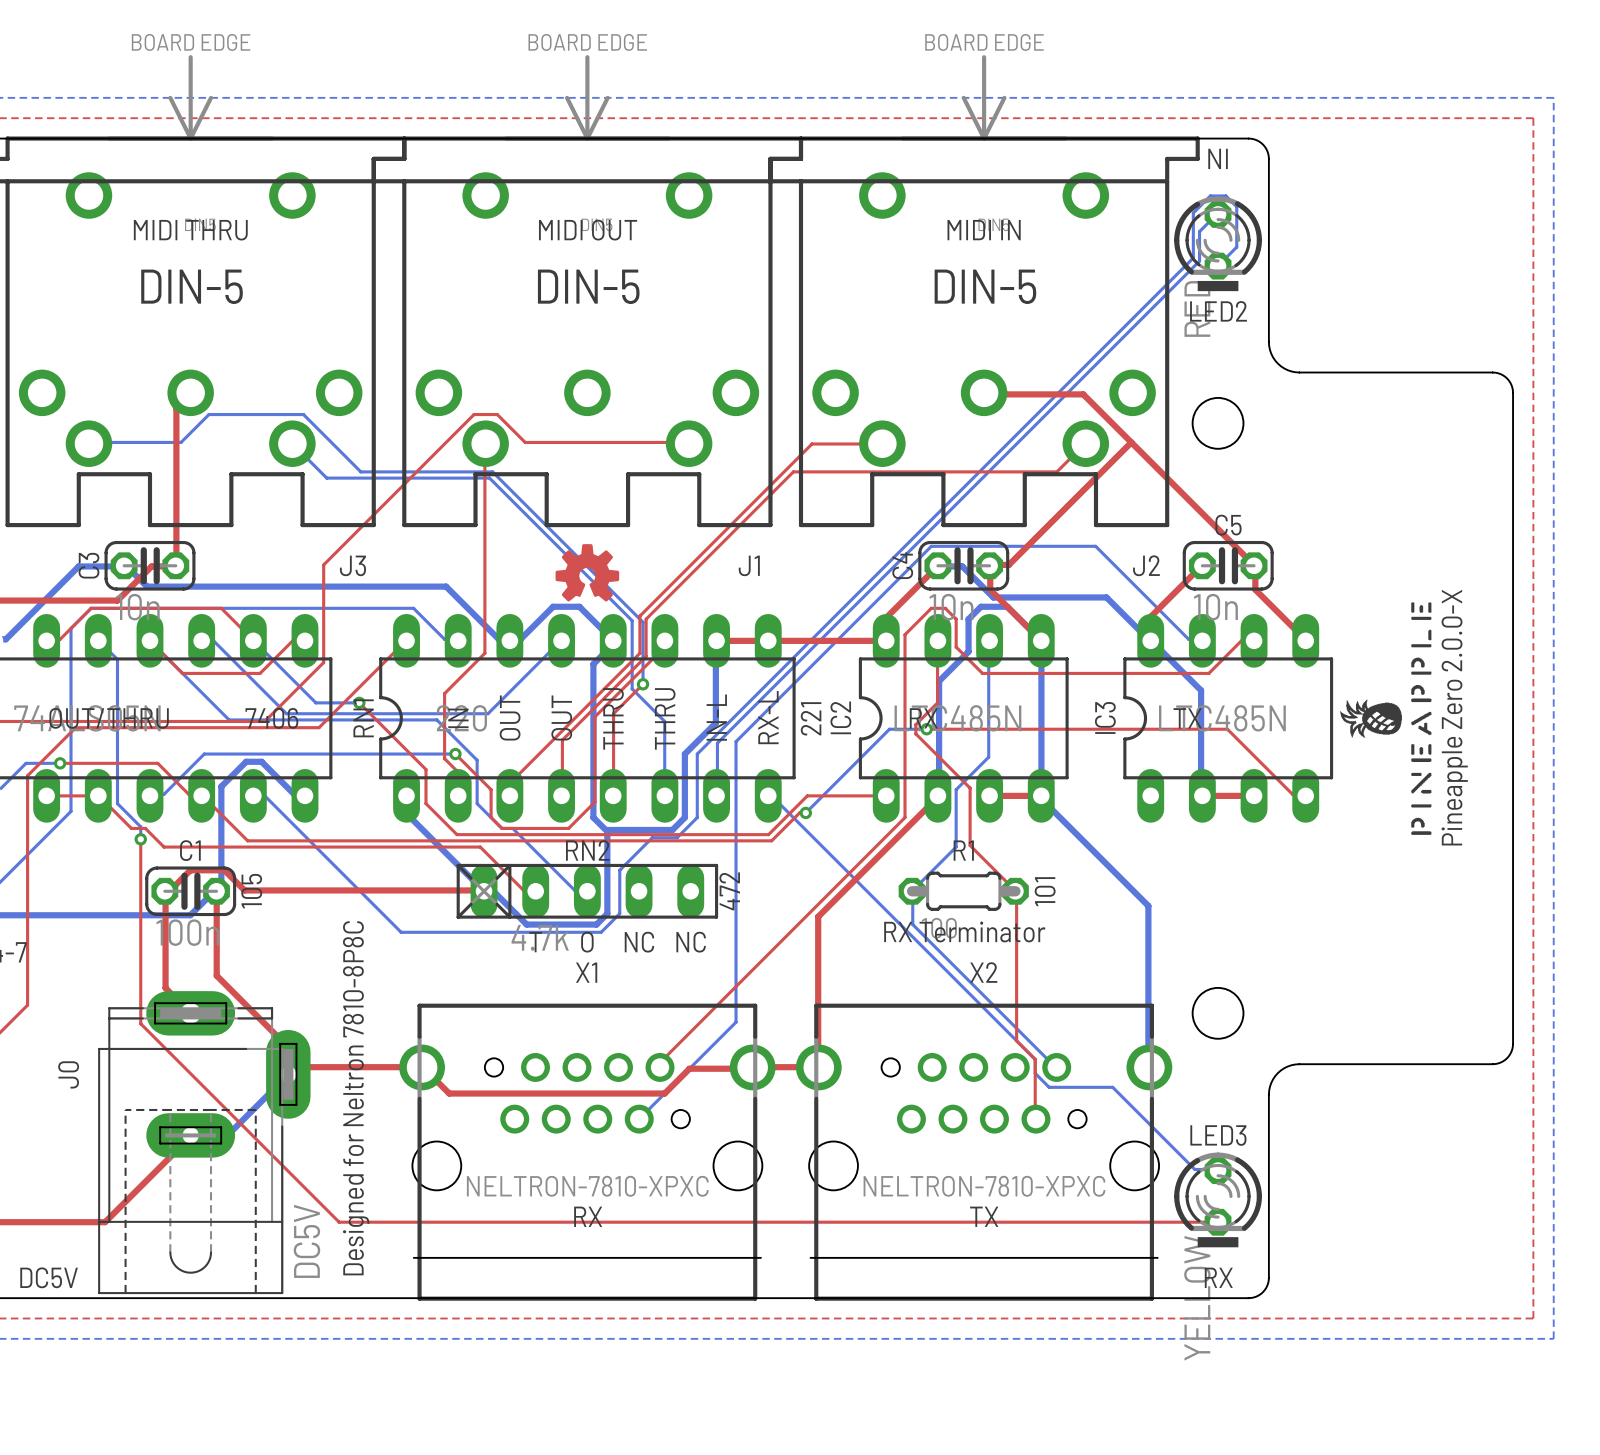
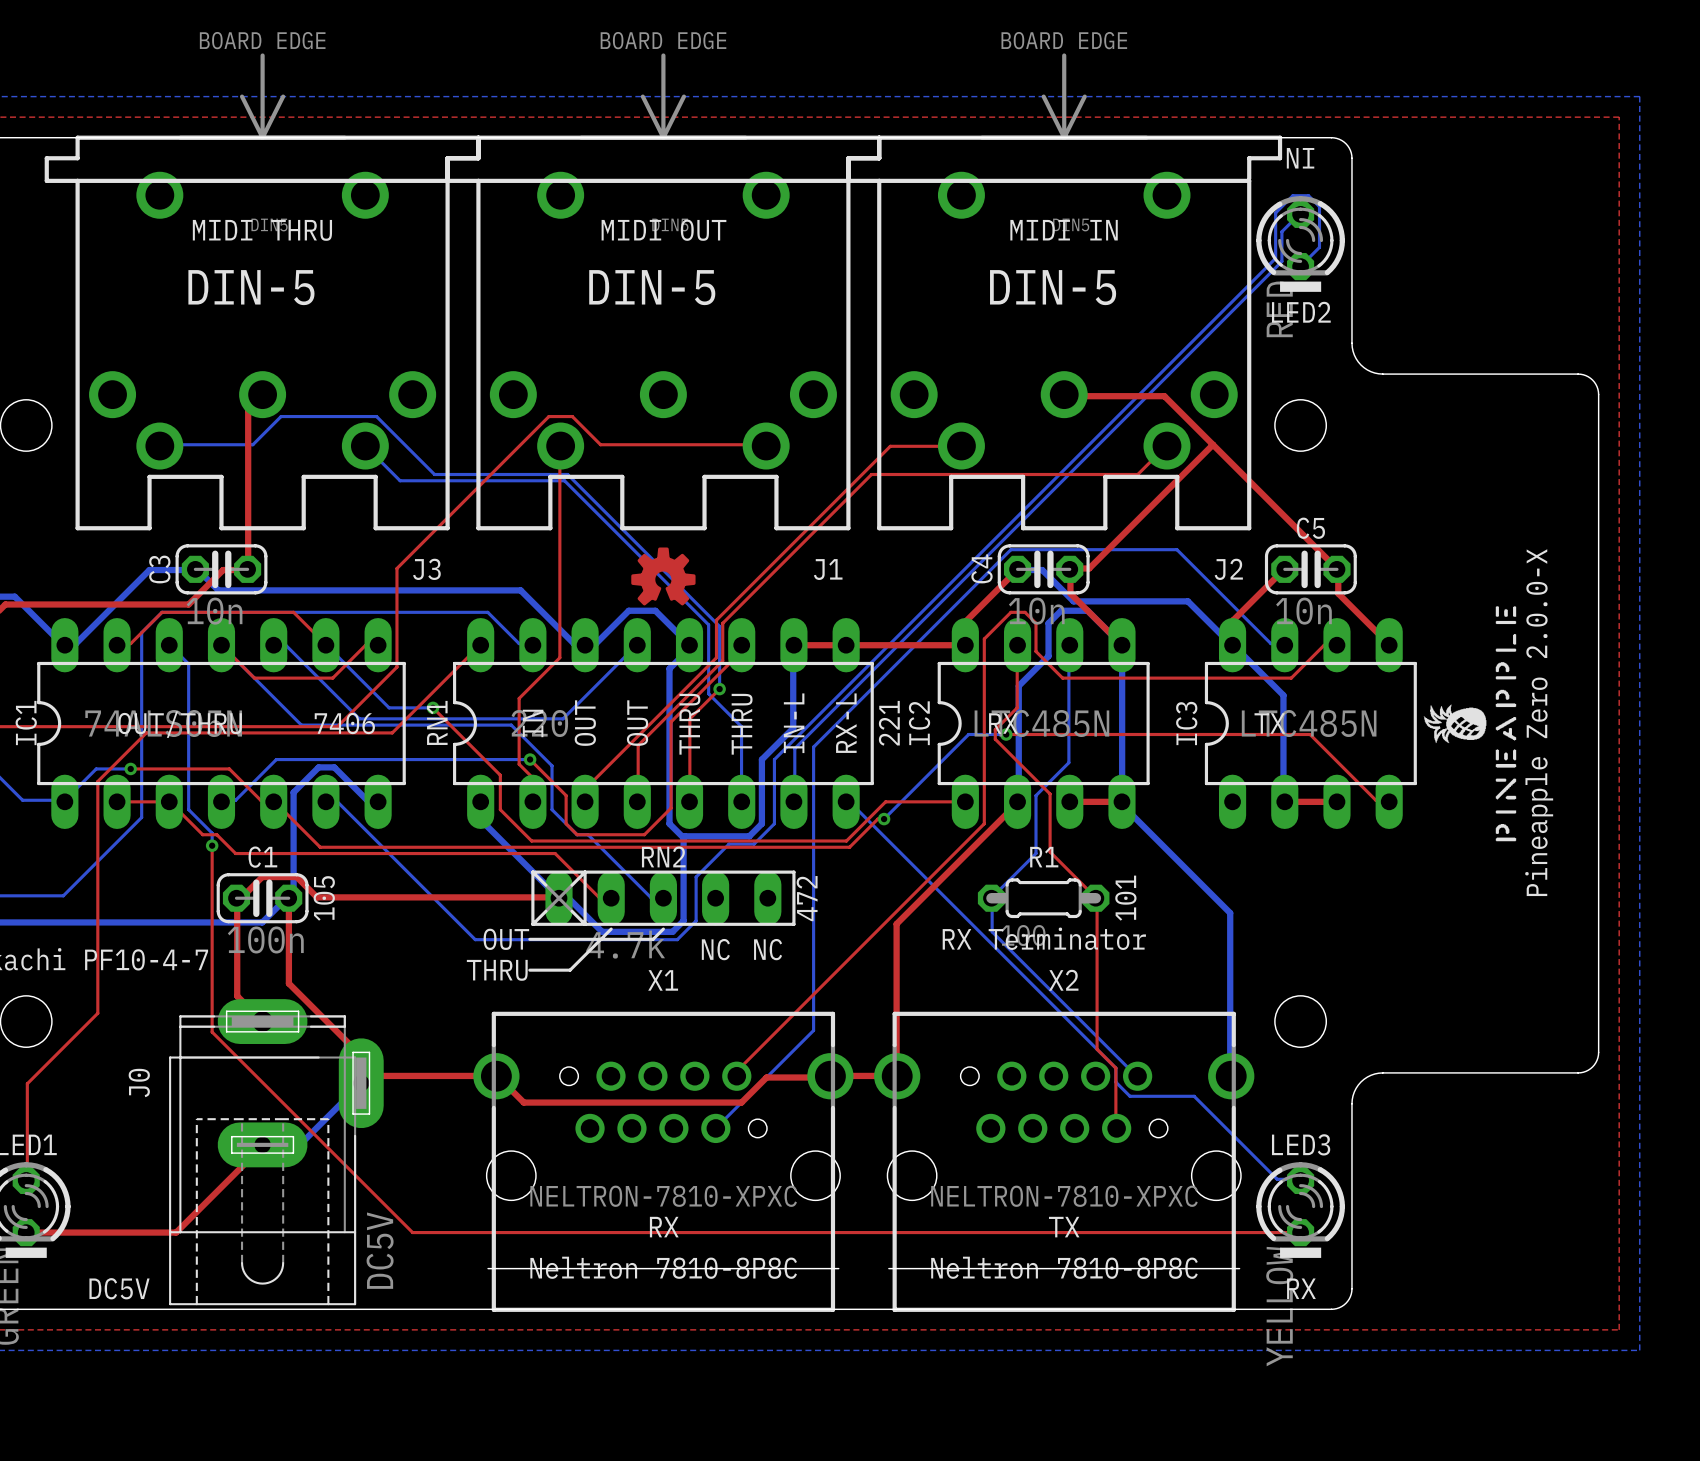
line: none -> (611, 929) (570, 970) (529, 970)
line: none -> (663, 929) (653, 939) (529, 939)
text: none -> OUT (506, 939)
text: T (535, 942) -> none
text: O (587, 942) -> none
text: none -> THRU (497, 970)
text: Designed for Neltron 7810-8P8C (356, 1098) -> none
text: none -> Neltron 7810-8P8C (663, 1267)
text: none -> Neltron 7810-8P8C (1064, 1267)

